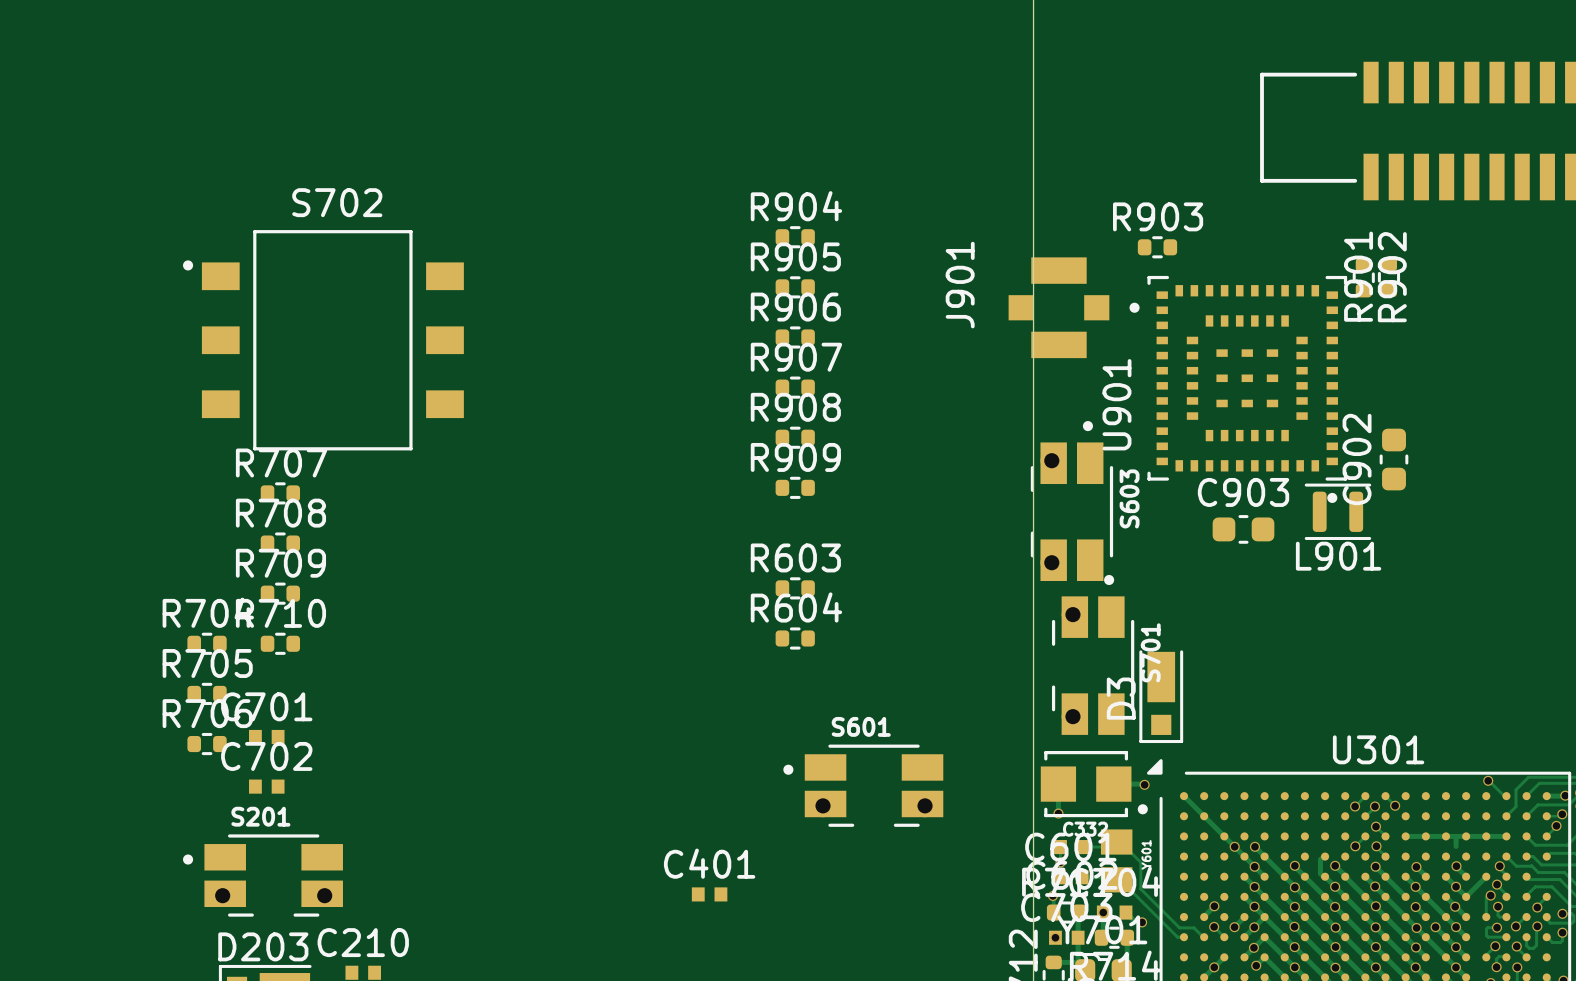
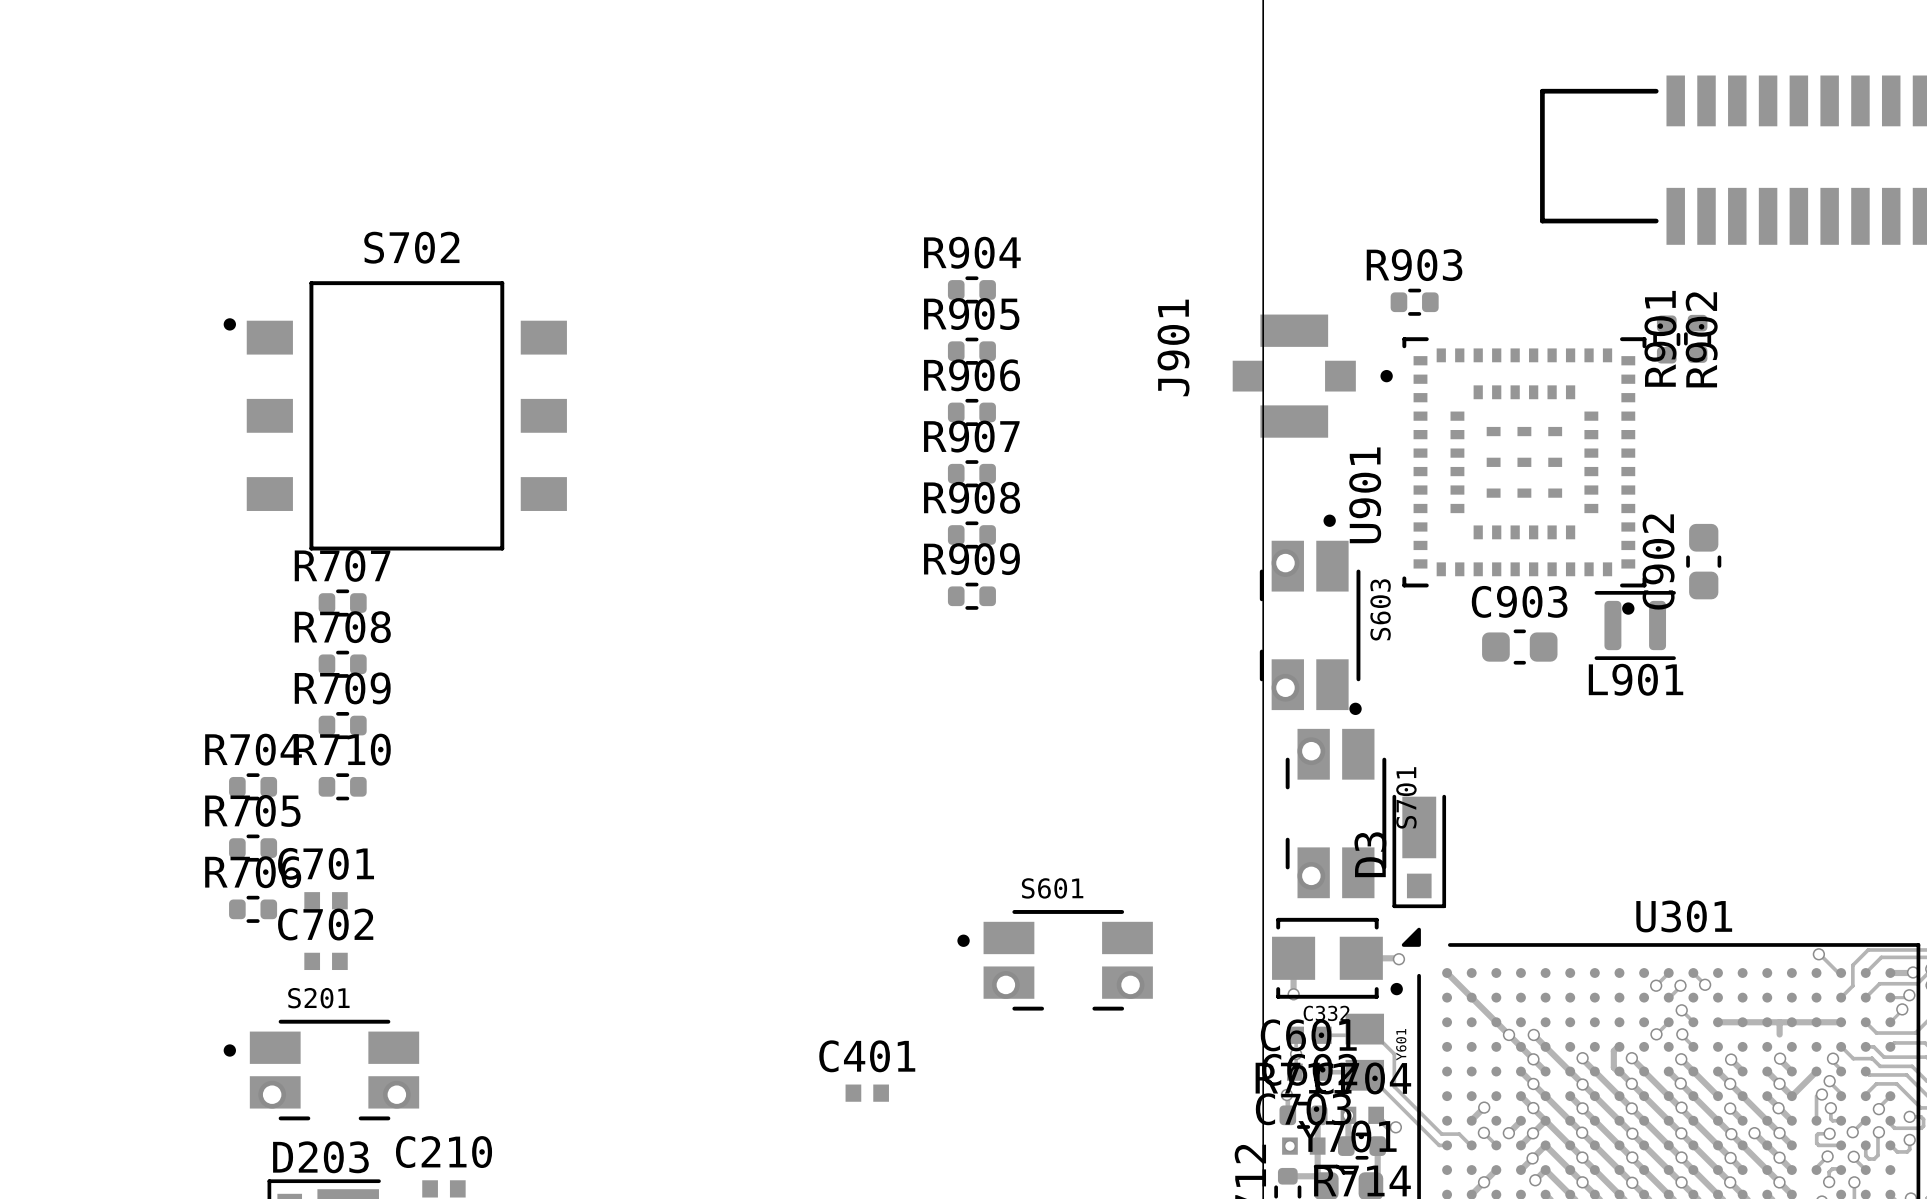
R603: (795, 588) -> none
R604: (795, 638) -> none

